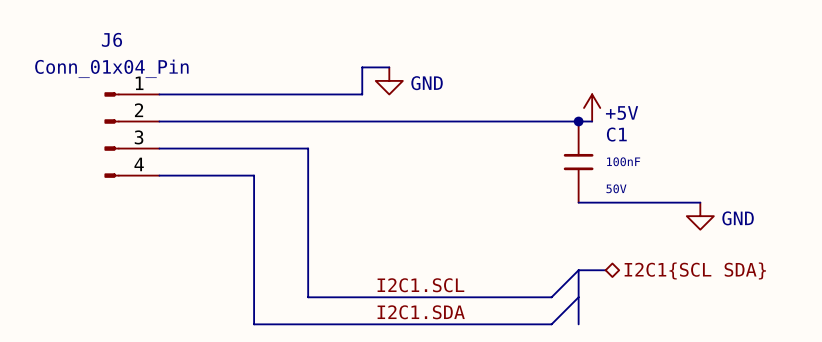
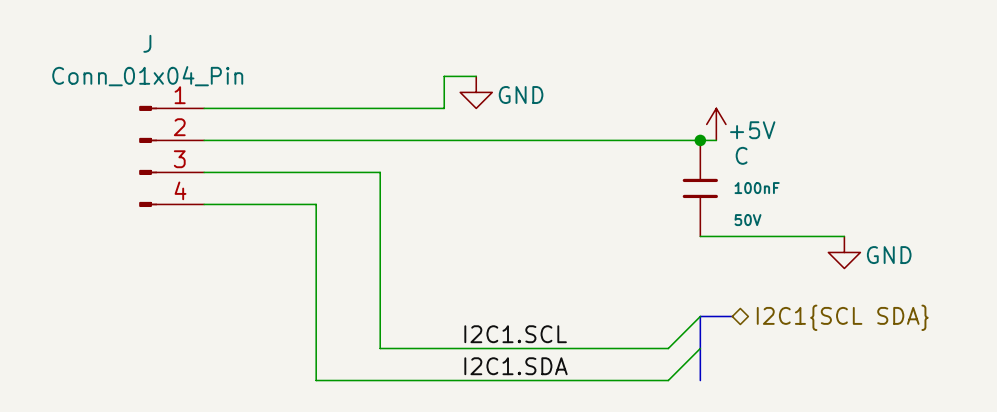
J6 name: J6 (111, 39) -> J (147, 43)
C1 name: C1 (616, 134) -> C (741, 155)

